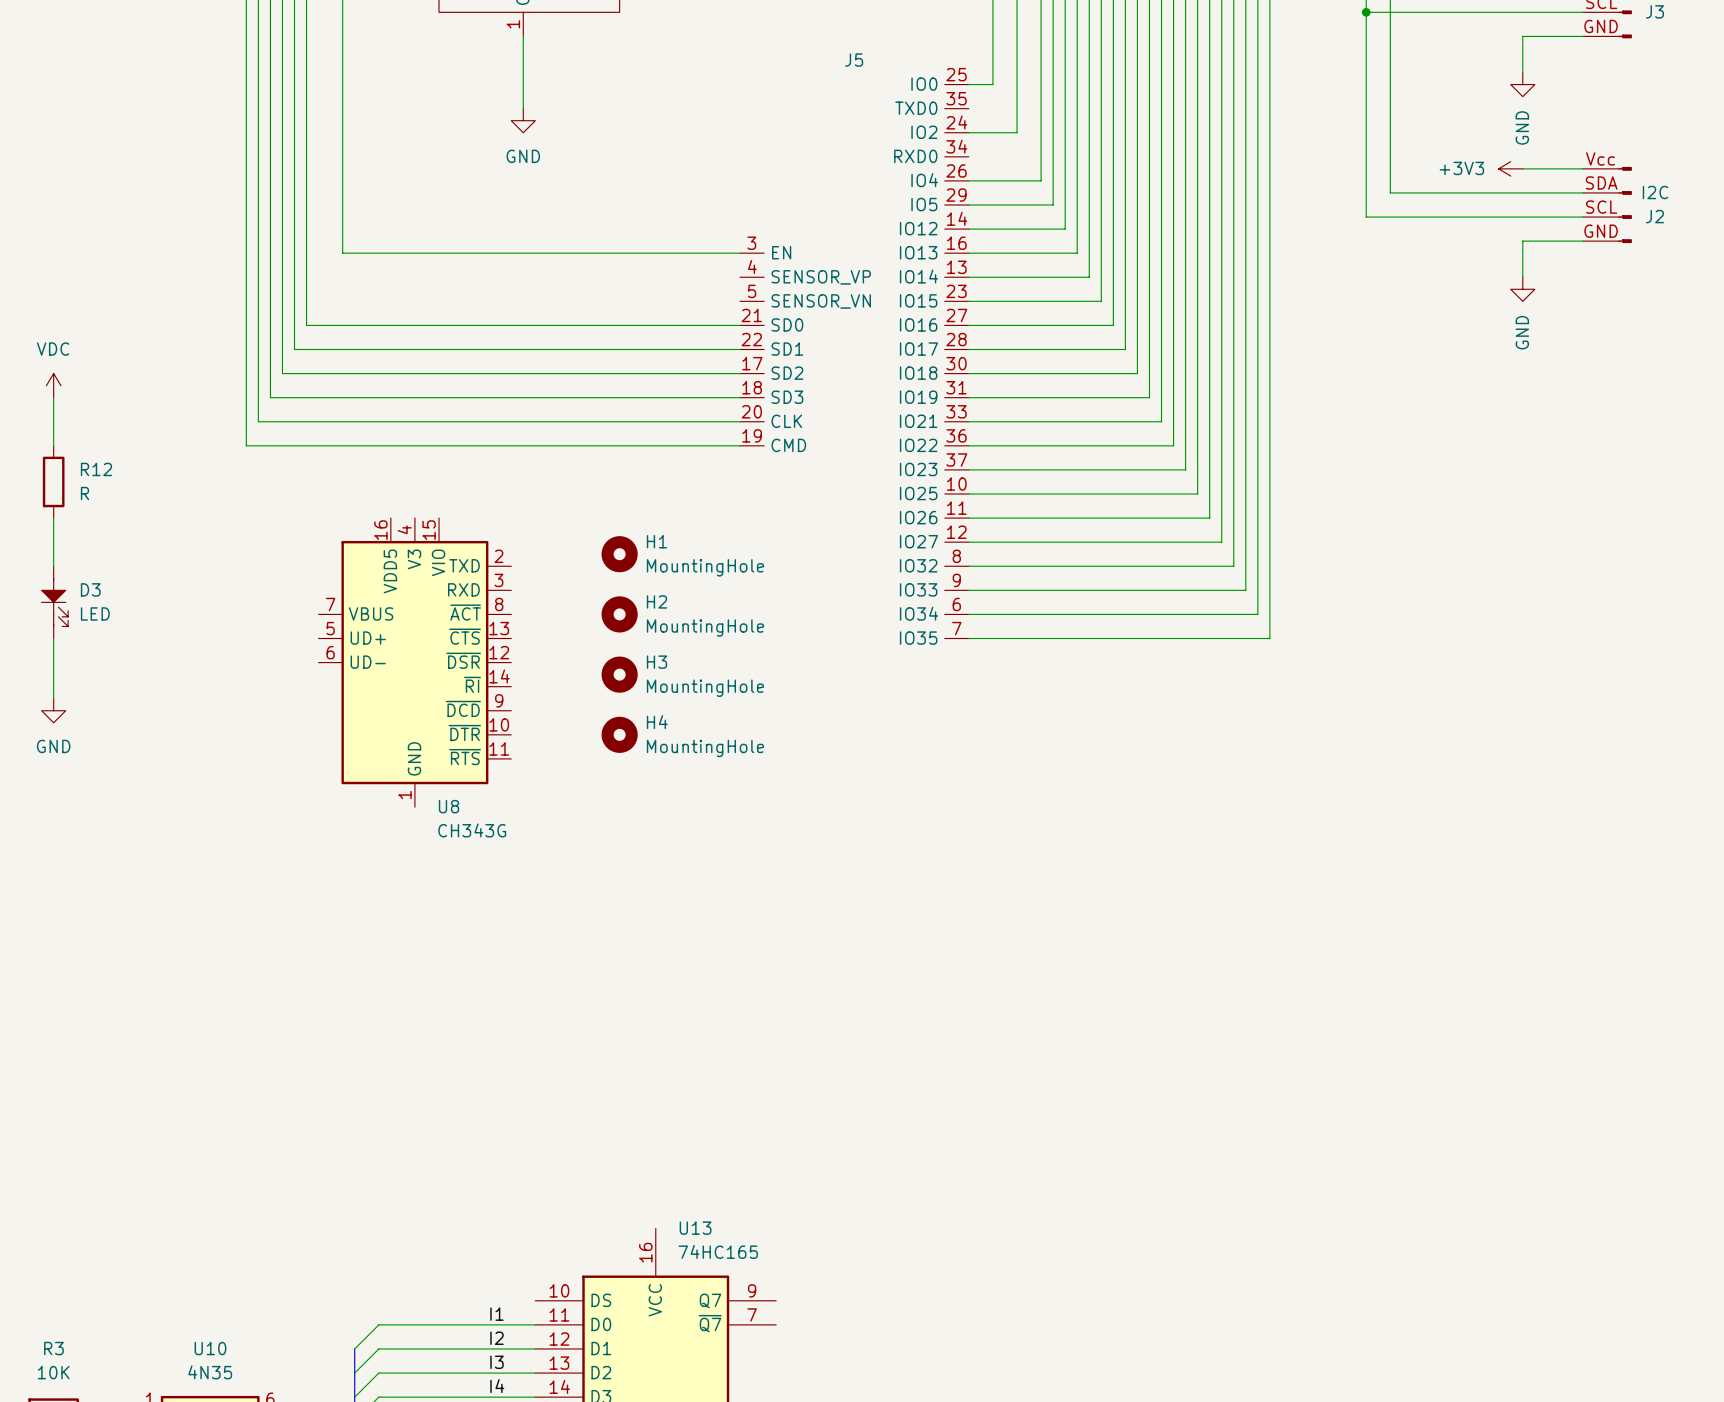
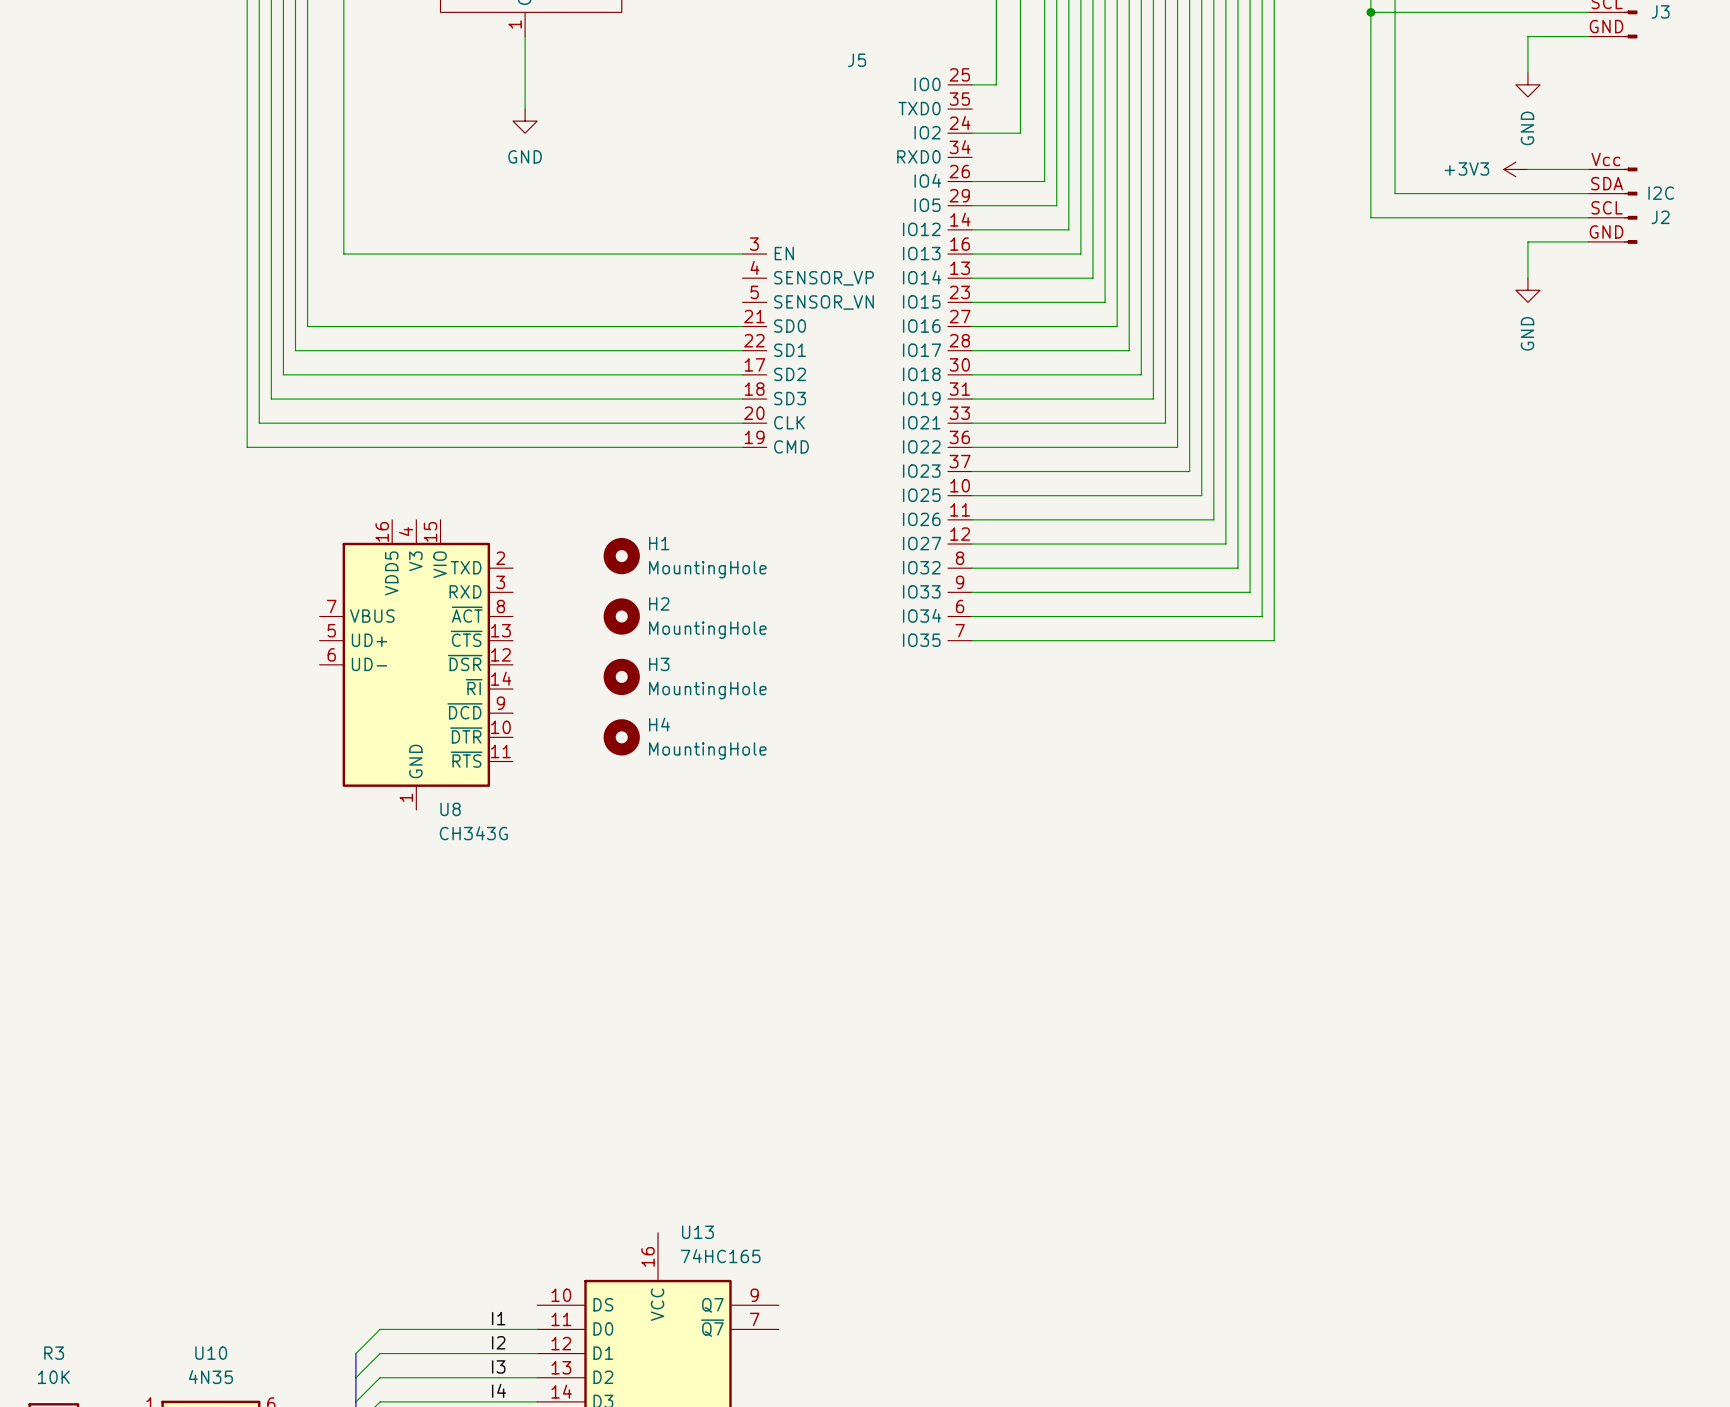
power symbol: VDC (53, 385) -> none
wire: (53, 397) (53, 445) -> none
R12: R (53, 481) -> none
wire: (53, 518) (53, 566) -> none
D3: LED (54, 602) -> none
wire: (53, 638) (53, 698) -> none
power symbol: GND (53, 710) -> none

